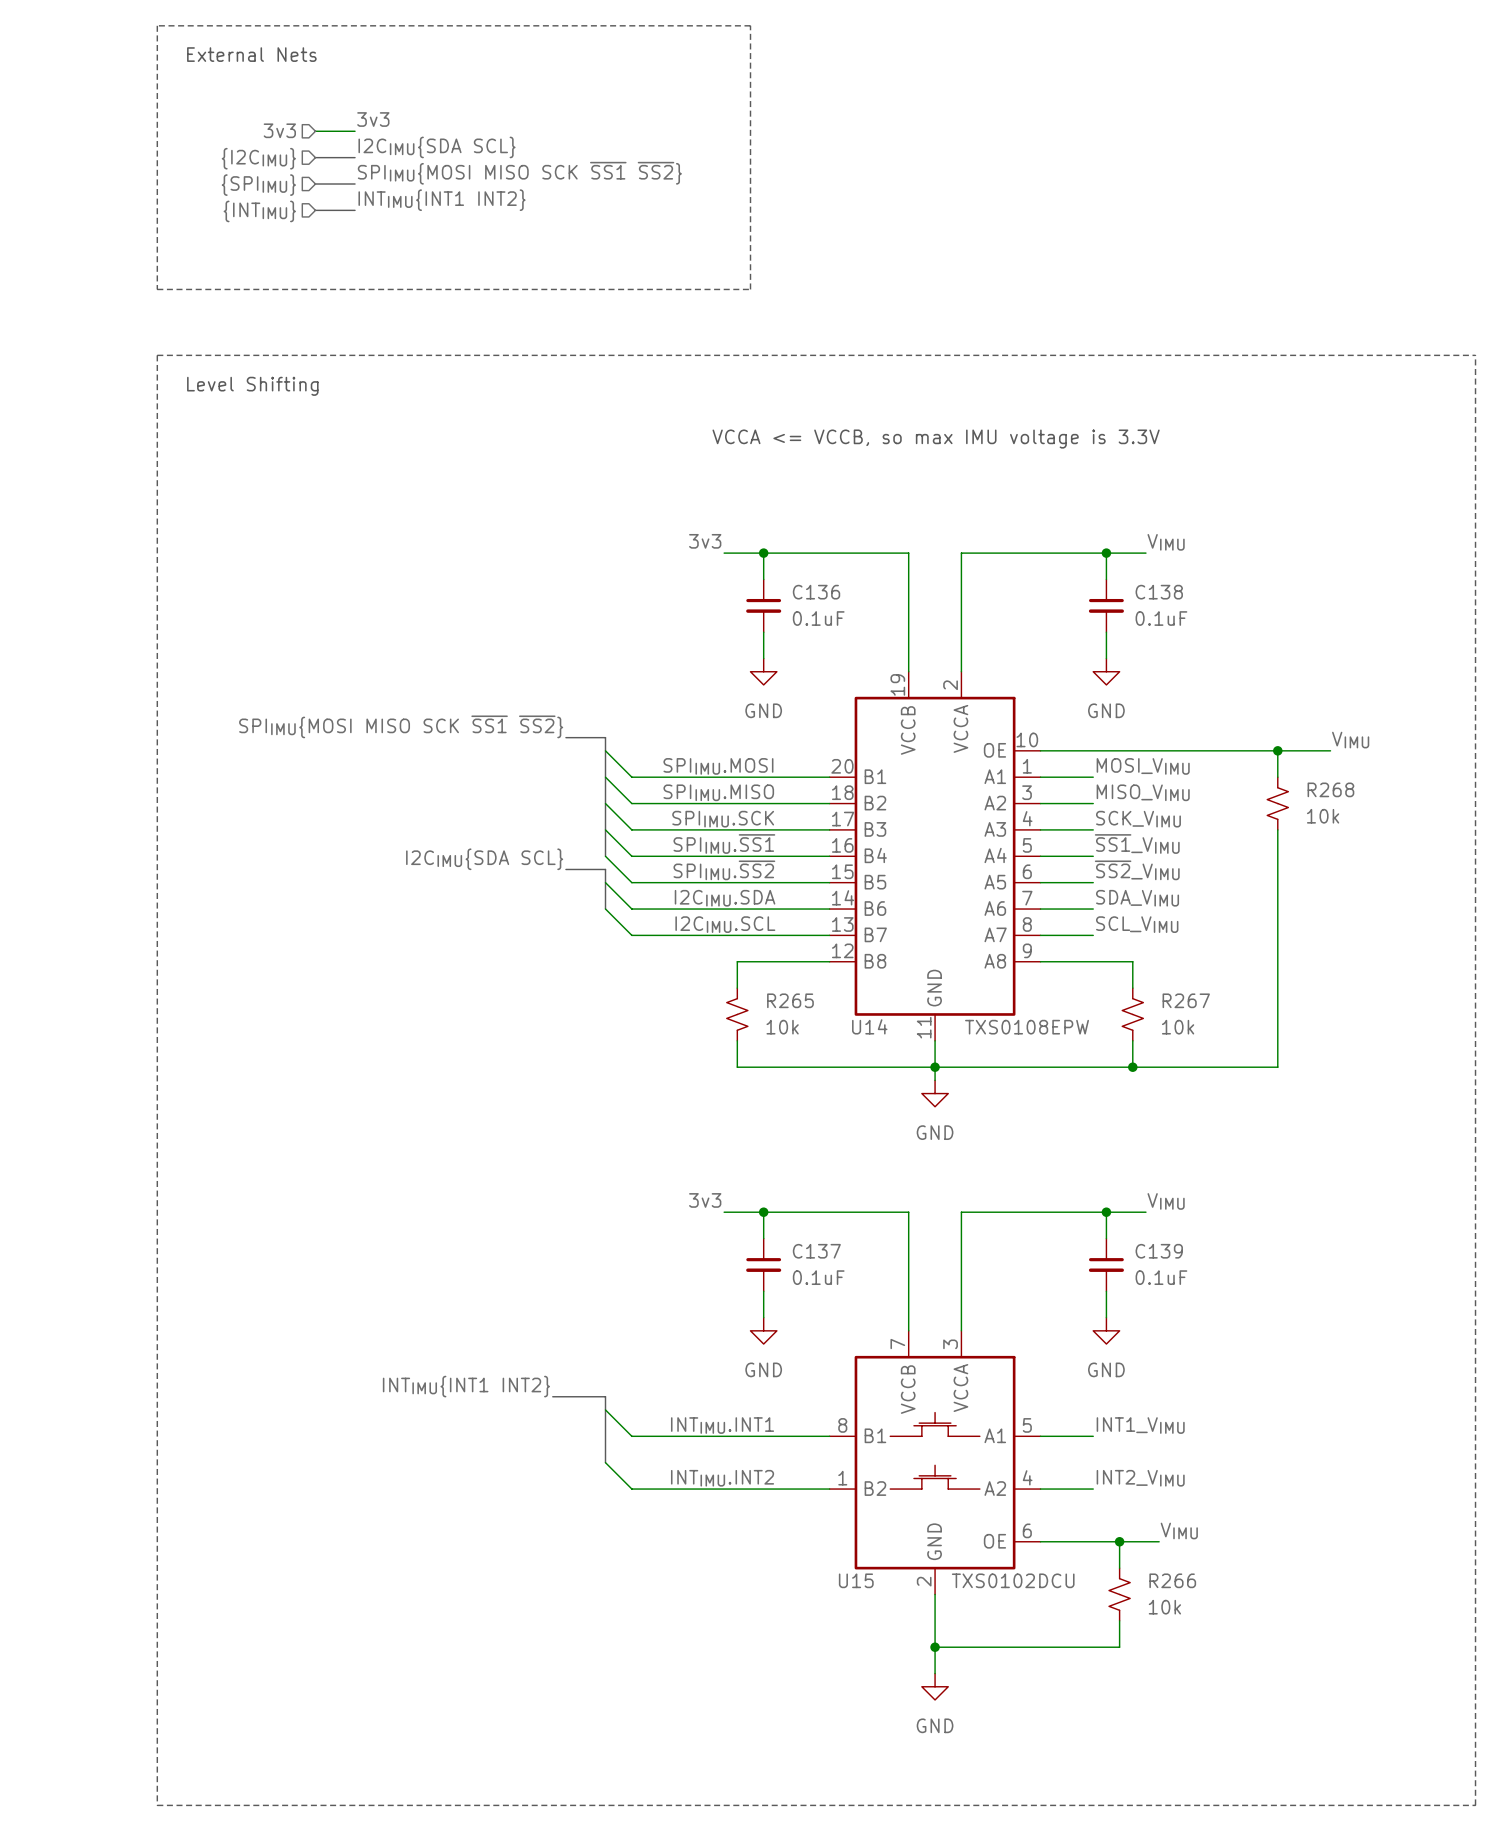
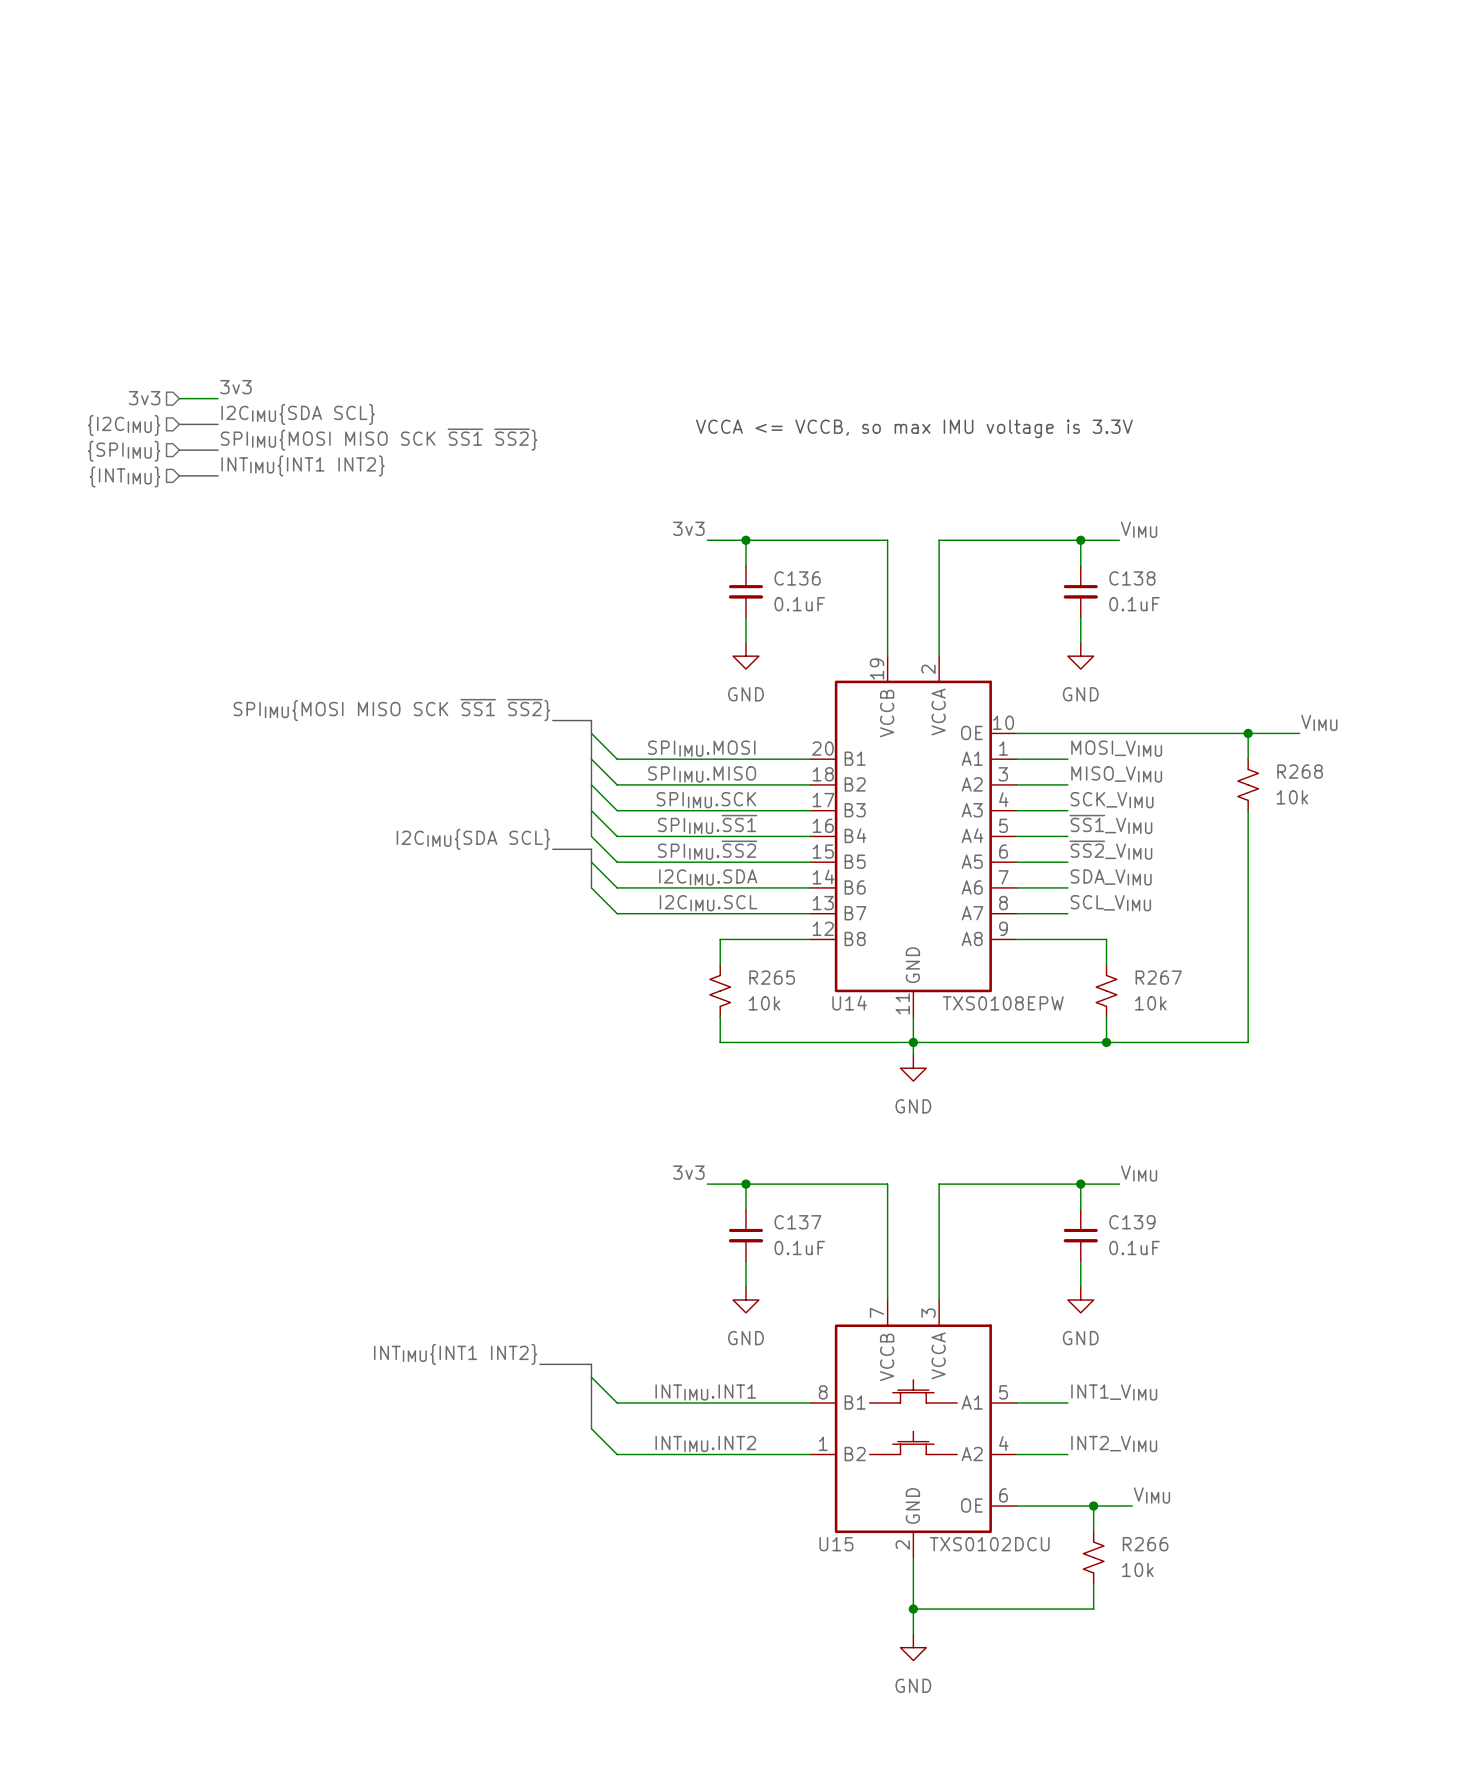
line: (157, 25) (157, 289) (750, 289) (750, 25) (157, 25) -> none
text: External Nets (251, 54) -> none
label: 3v3 (373, 119) -> none
hierarchical label: 3v3 (279, 130) -> none
wire: (315, 131) (355, 131) -> none
label: I2CIMU{SDA SCL} (436, 147) -> none
bus: (315, 157) (355, 157) -> none
hierarchical label: {I2CIMU} (258, 158) -> none
label: SPIIMU{MOSI MISO SCK ~{SS1} ~{SS2}} (519, 173) -> none
bus: (315, 184) (355, 184) -> none
hierarchical label: {SPIIMU} (258, 185) -> none
label: INTIMU{INT1 INT2} (442, 200) -> none
bus: (315, 210) (355, 210) -> none
hierarchical label: {INTIMU} (259, 211) -> none
line: (157, 355) (157, 1805) (1475, 1805) (1475, 355) (157, 355) -> none
text: Level Shifting (252, 386) -> none
label: none -> 3v3 (235, 387)
hierarchical label: none -> 3v3 (144, 398)
wire: none -> (179, 398) (218, 398)
label: none -> I2CIMU{SDA SCL} (298, 414)
bus: none -> (179, 424) (218, 424)
hierarchical label: none -> {I2CIMU} (124, 425)
label: none -> SPIIMU{MOSI MISO SCK ~{SS1} ~{SS2}} (379, 439)
bus: none -> (179, 450) (218, 450)
hierarchical label: none -> {SPIIMU} (124, 451)
label: none -> INTIMU{INT1 INT2} (303, 465)
bus: none -> (179, 475) (218, 475)
hierarchical label: none -> {INTIMU} (125, 476)

